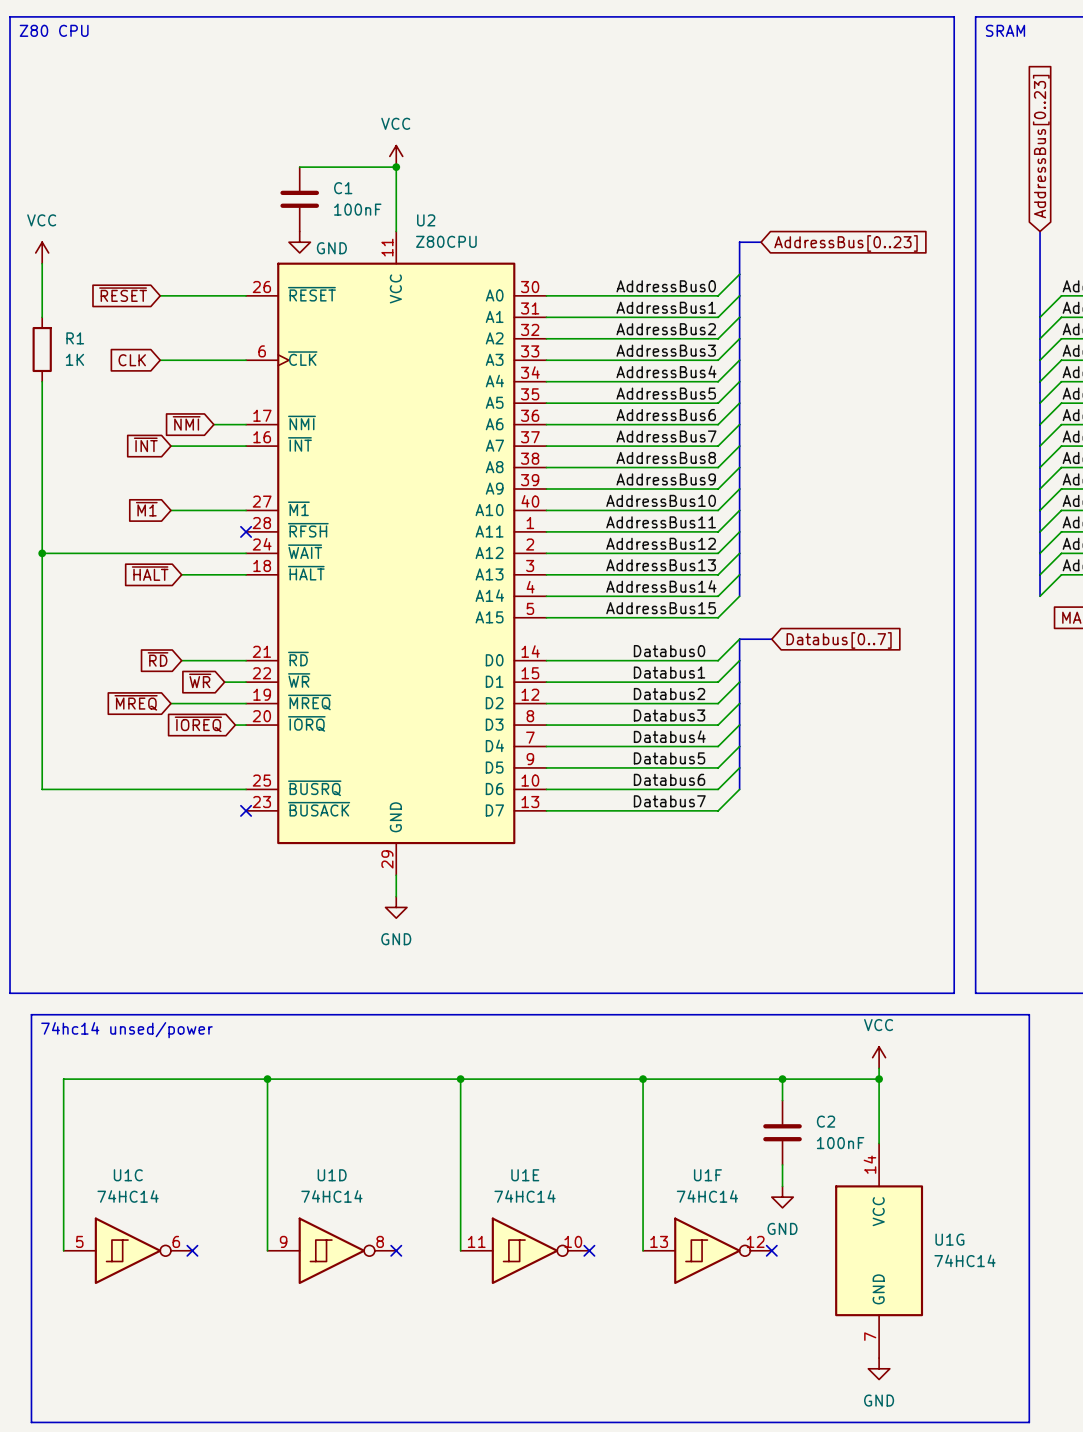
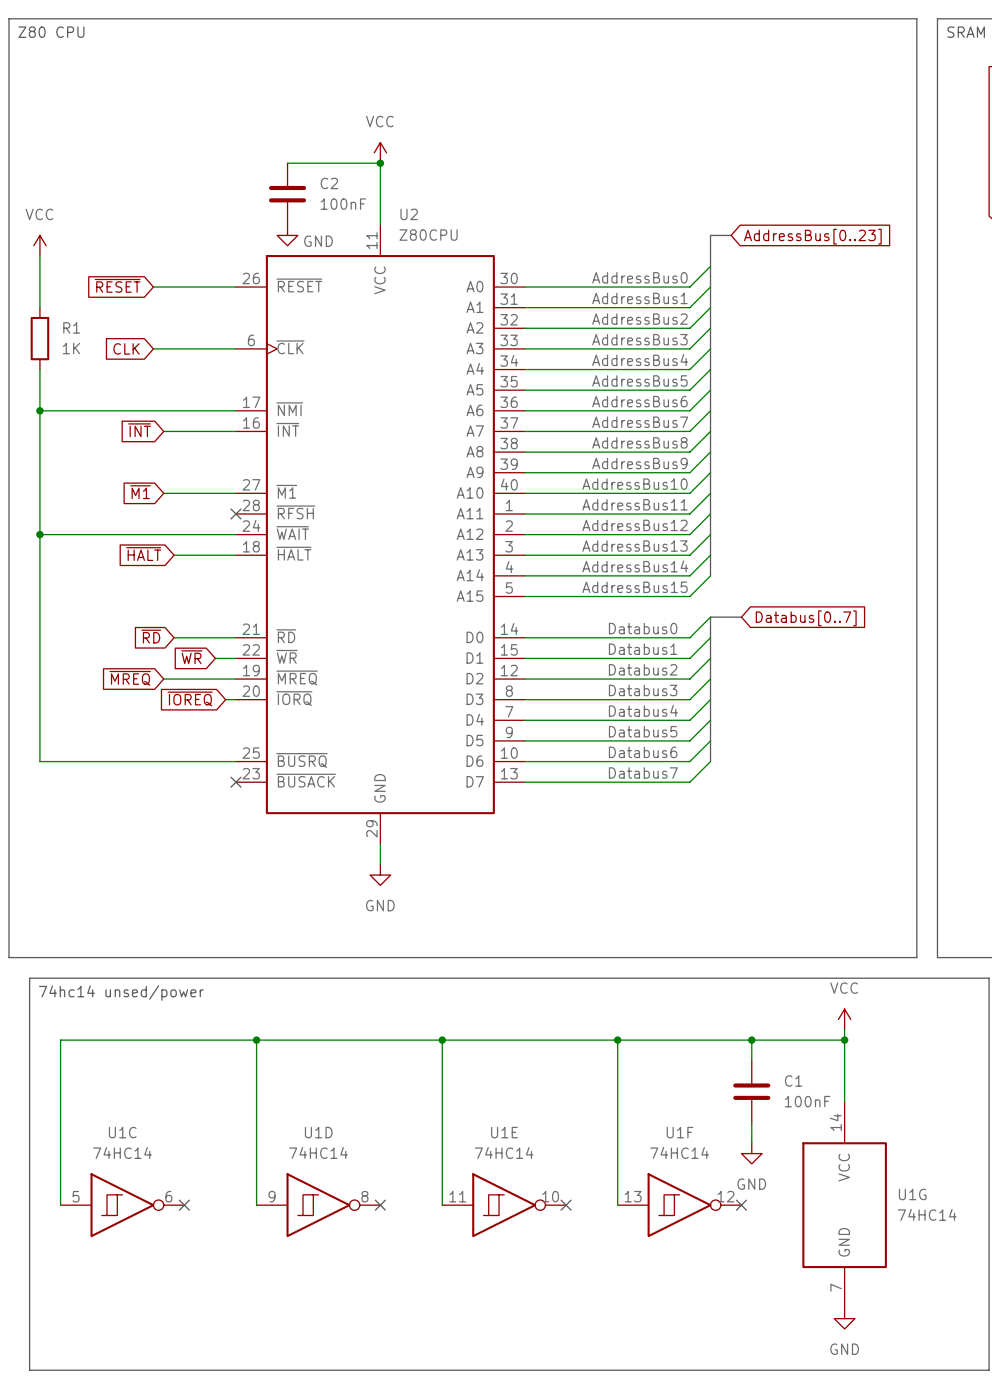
C1 name: C1 (343, 188) -> C2 (329, 183)
global label: ~{NMI} (186, 423) -> none
wire: none -> (39, 410) (205, 410)
junction: none -> (39, 410)
C2 name: C2 (826, 1121) -> C1 (793, 1080)

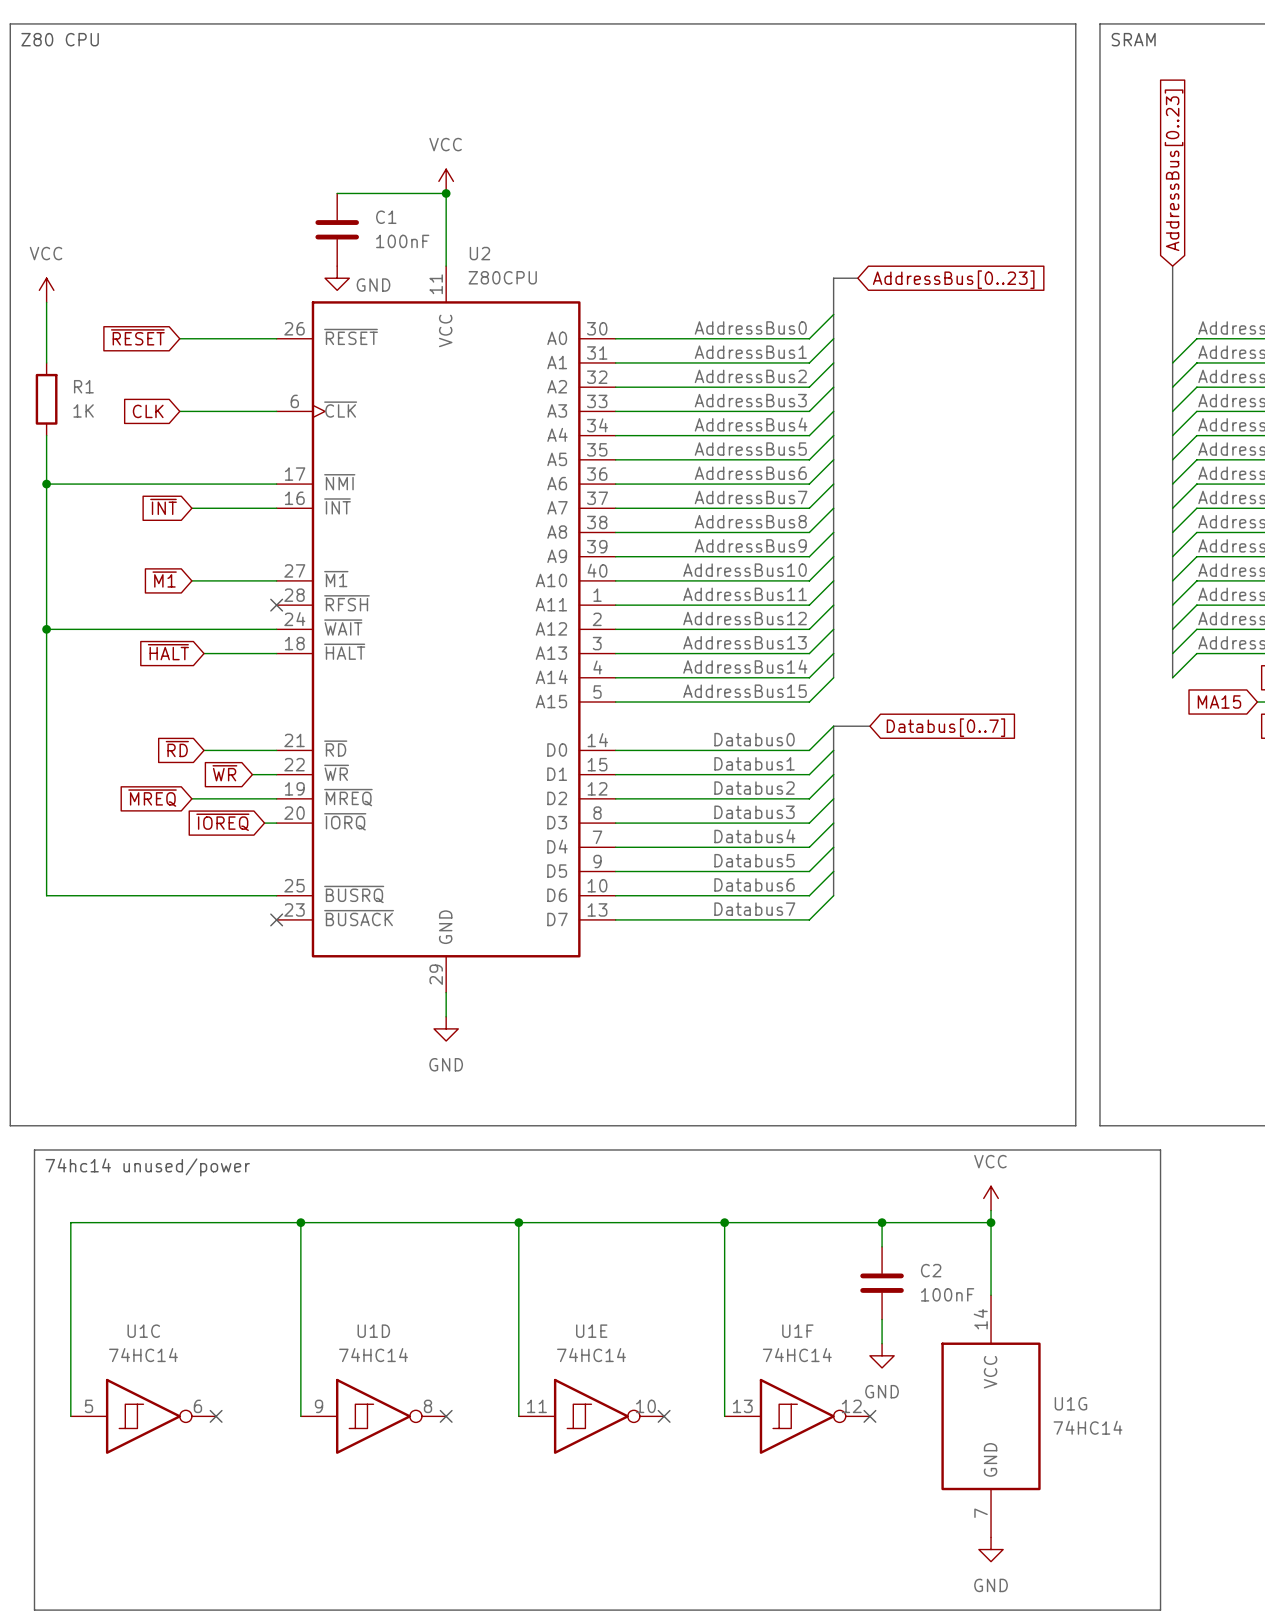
C2 name: C2 (329, 183) -> C1 (386, 217)
text: 74hc14 unsed/power (121, 993) -> 74hc14 unused/power (147, 1167)
C1 name: C1 (793, 1080) -> C2 (931, 1270)

